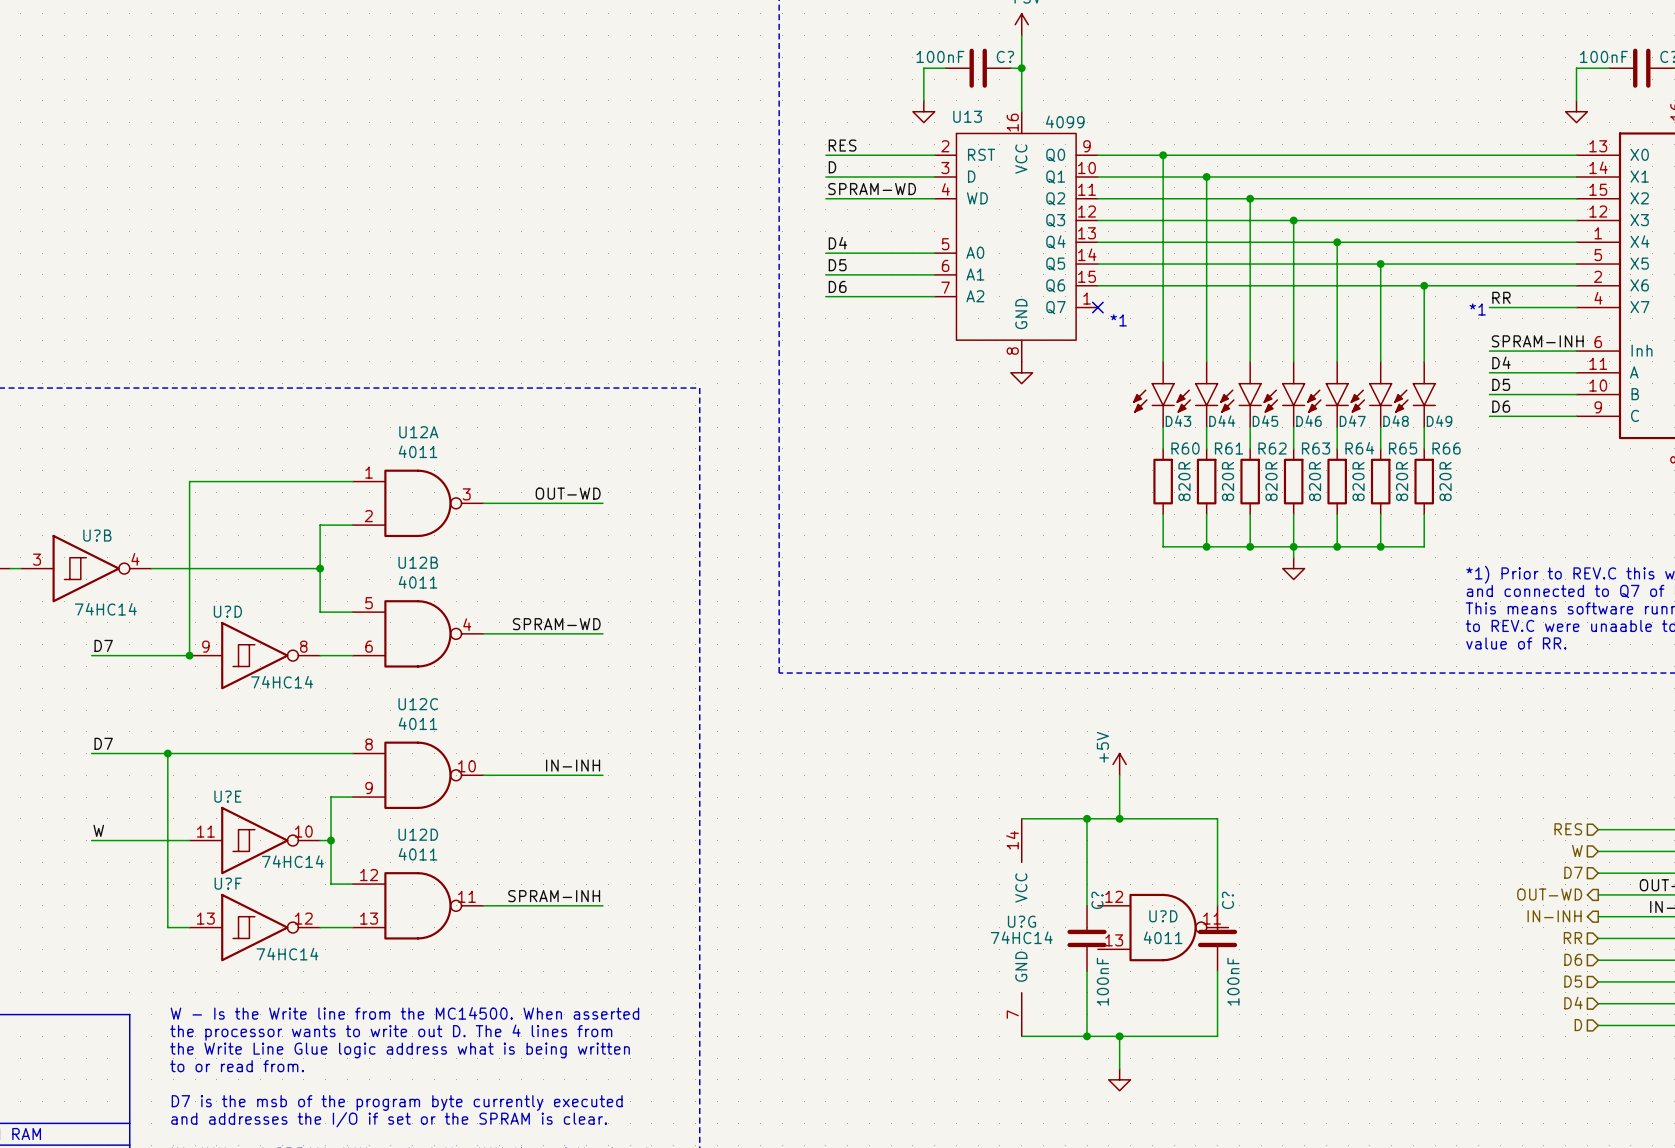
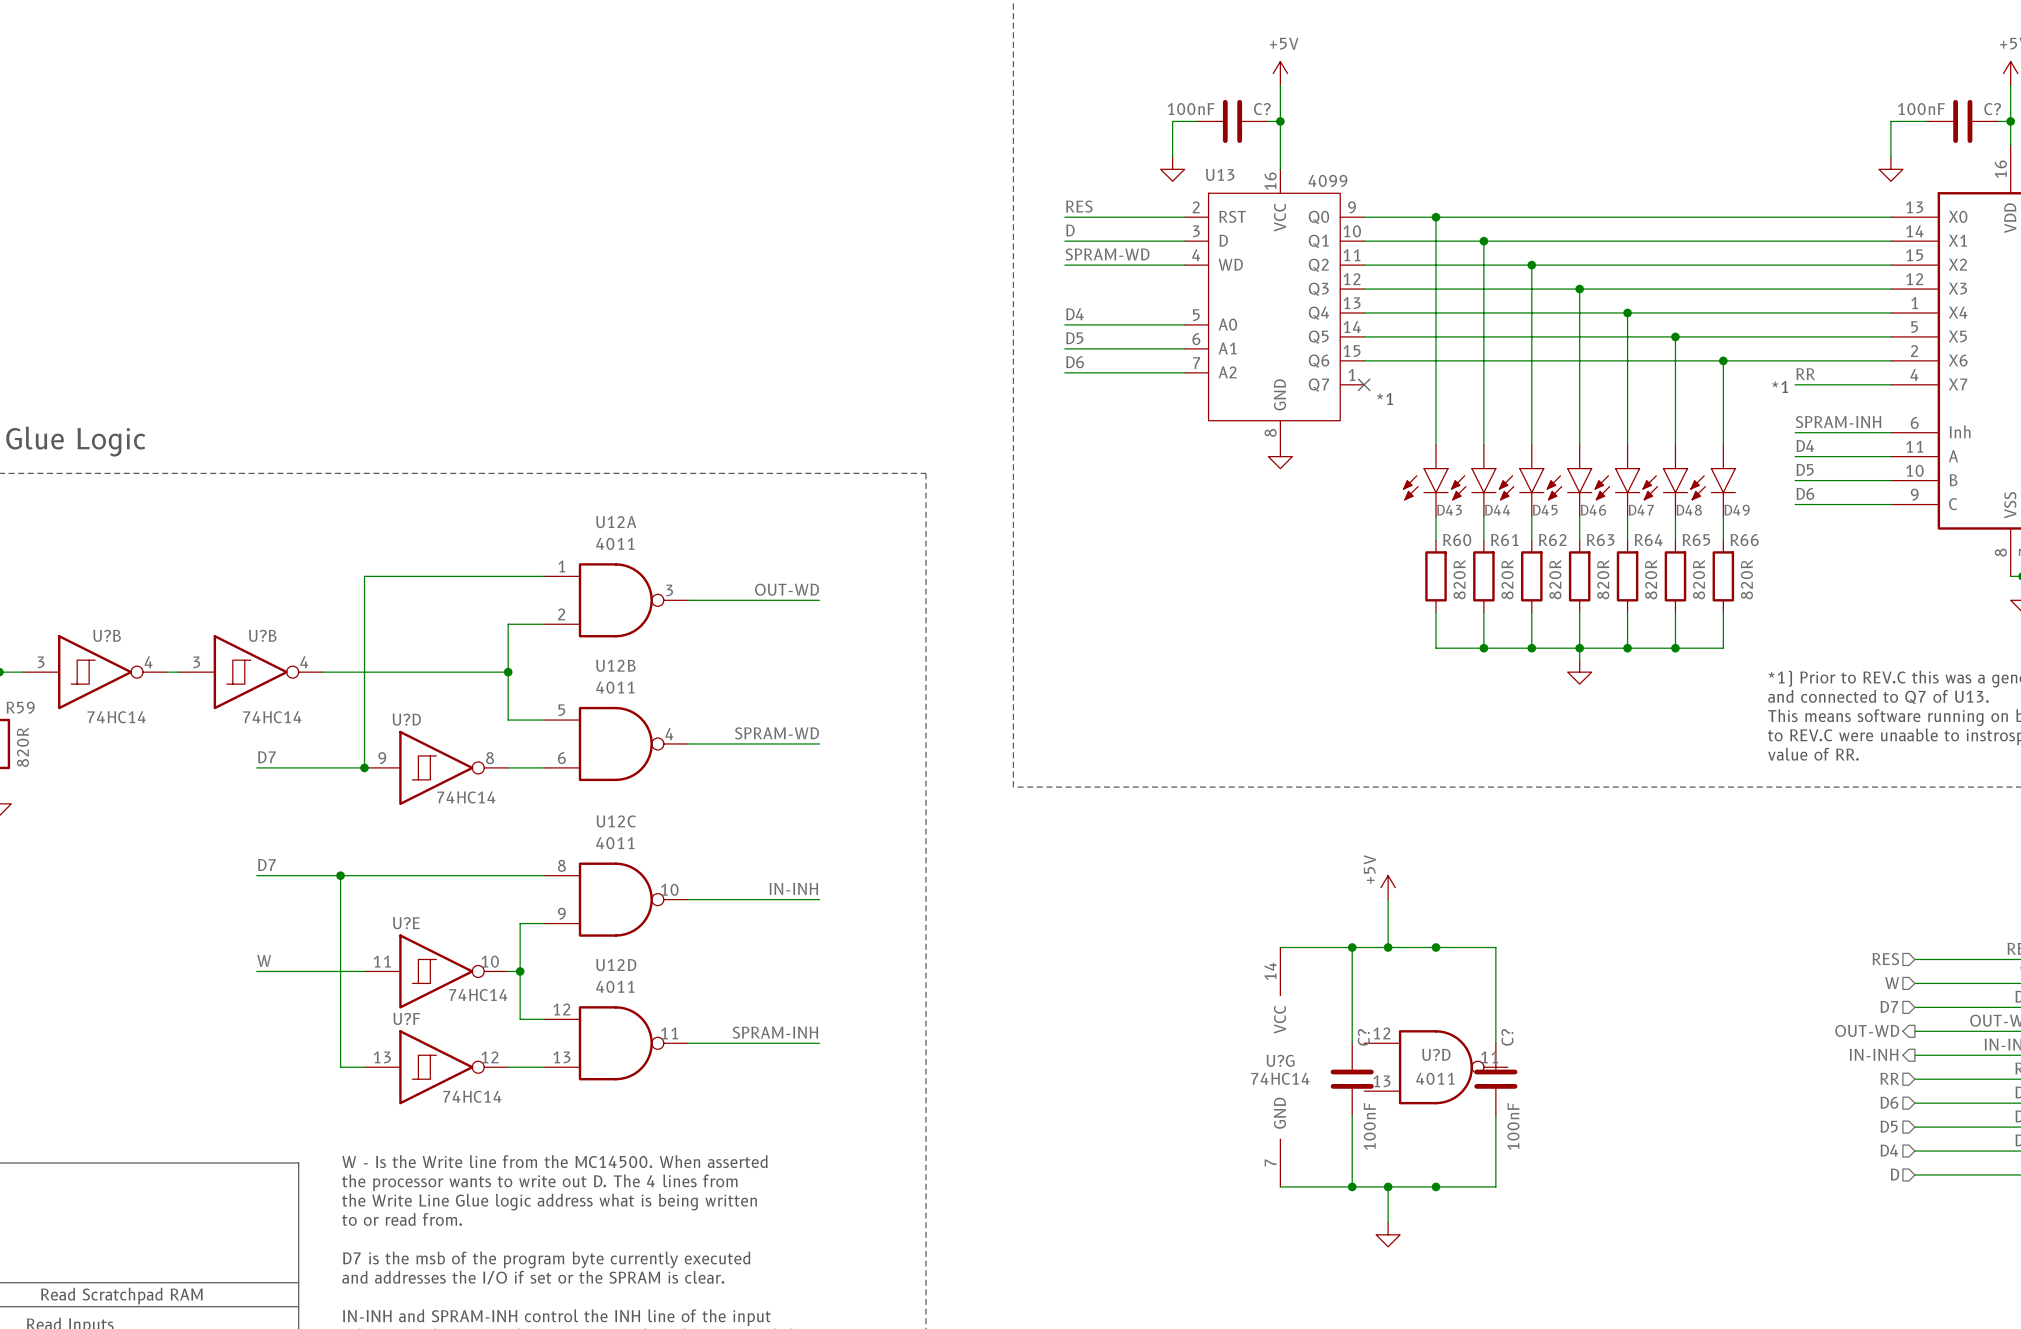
junction: none -> (1436, 947)
junction: none -> (1436, 1186)

